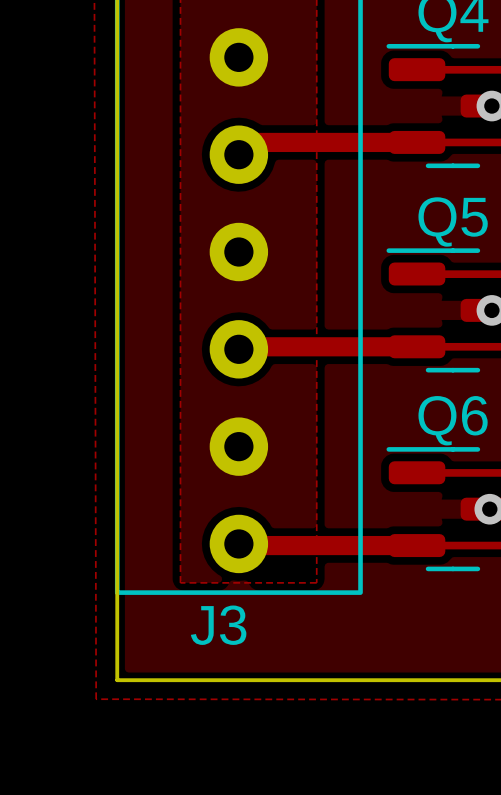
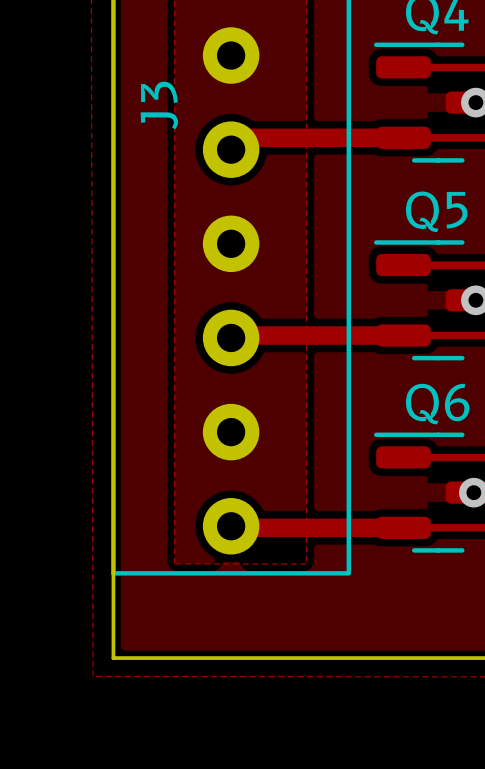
J3 name rotation: 0° (218, 625) -> 90° counterclockwise (159, 105)
J3 name position: J3 (218, 625) -> J3 (159, 105)

